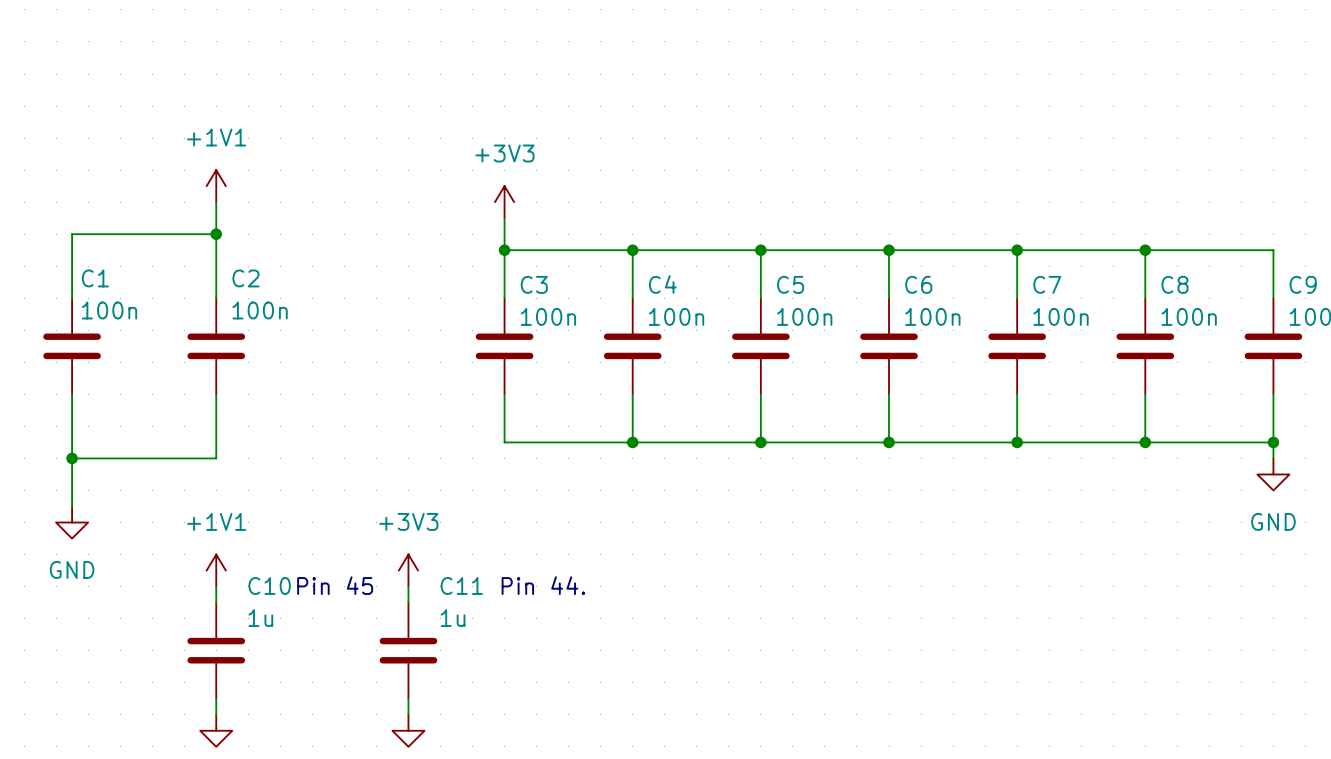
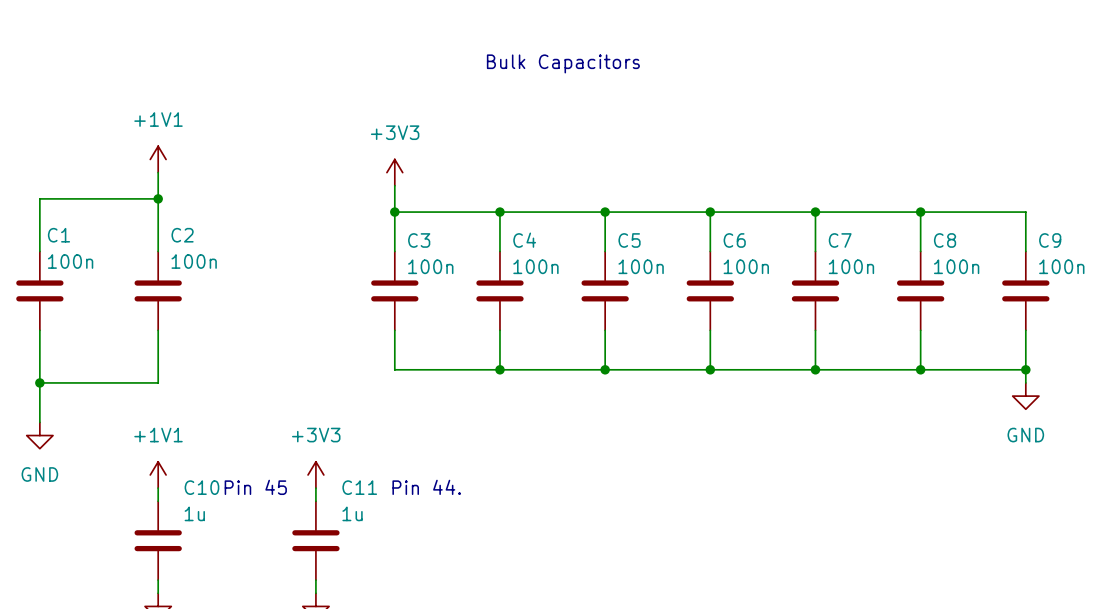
text: none -> Bulk Capacitors (563, 63)

